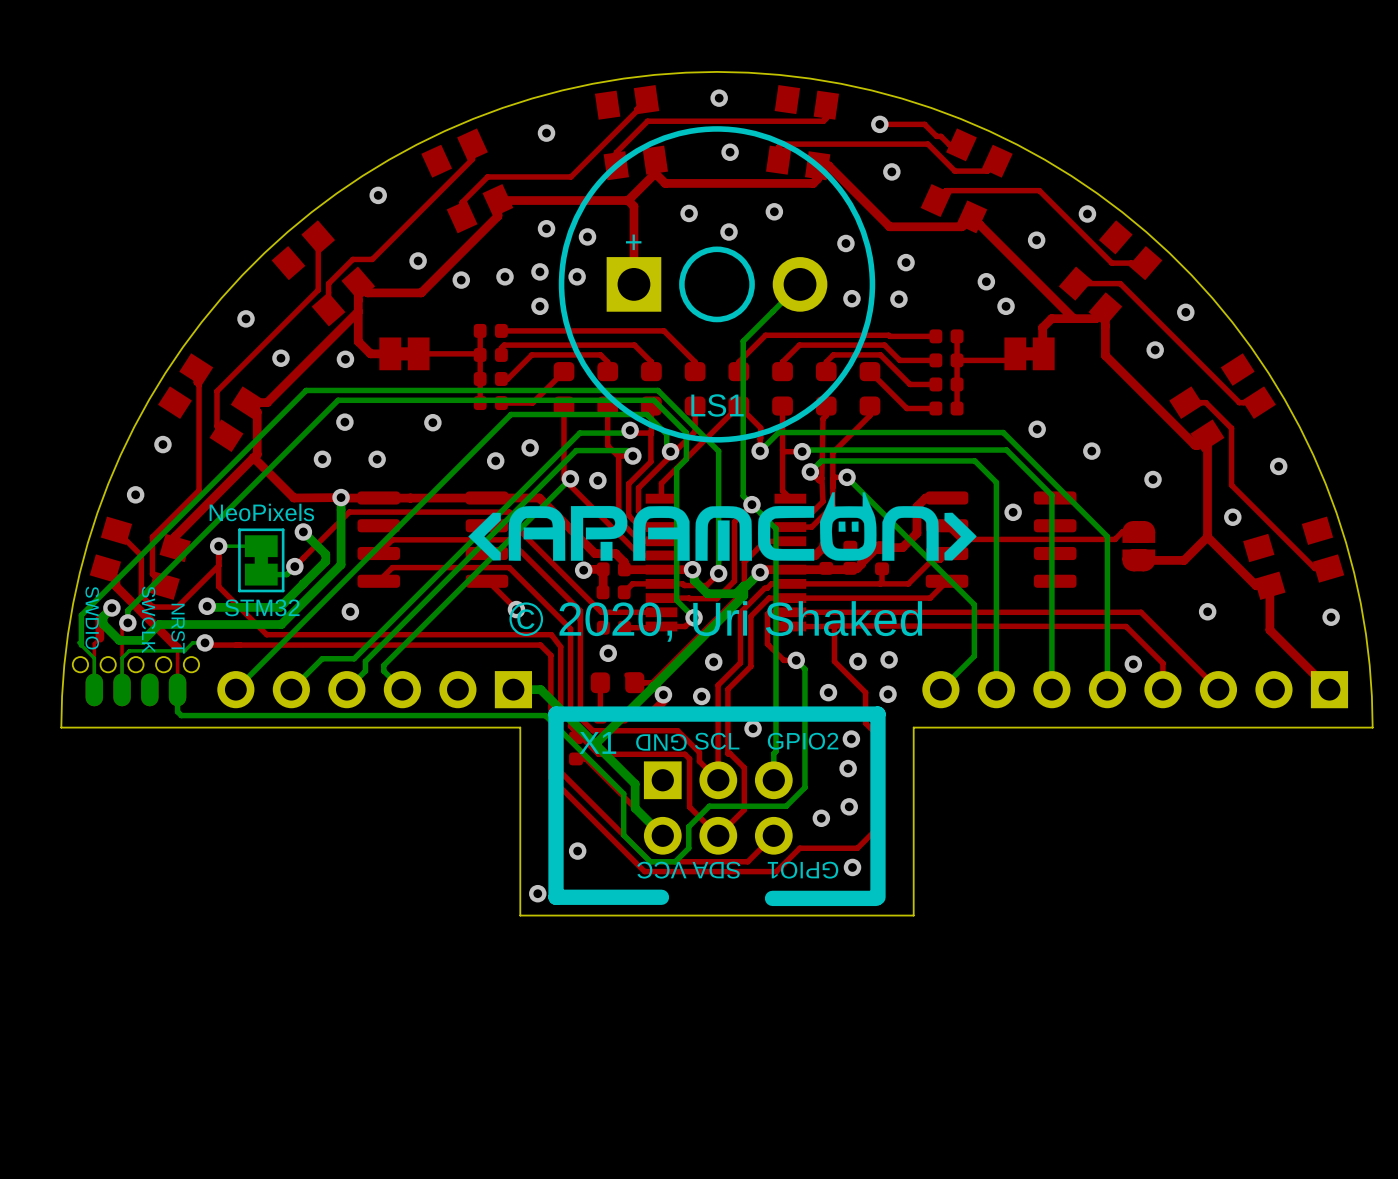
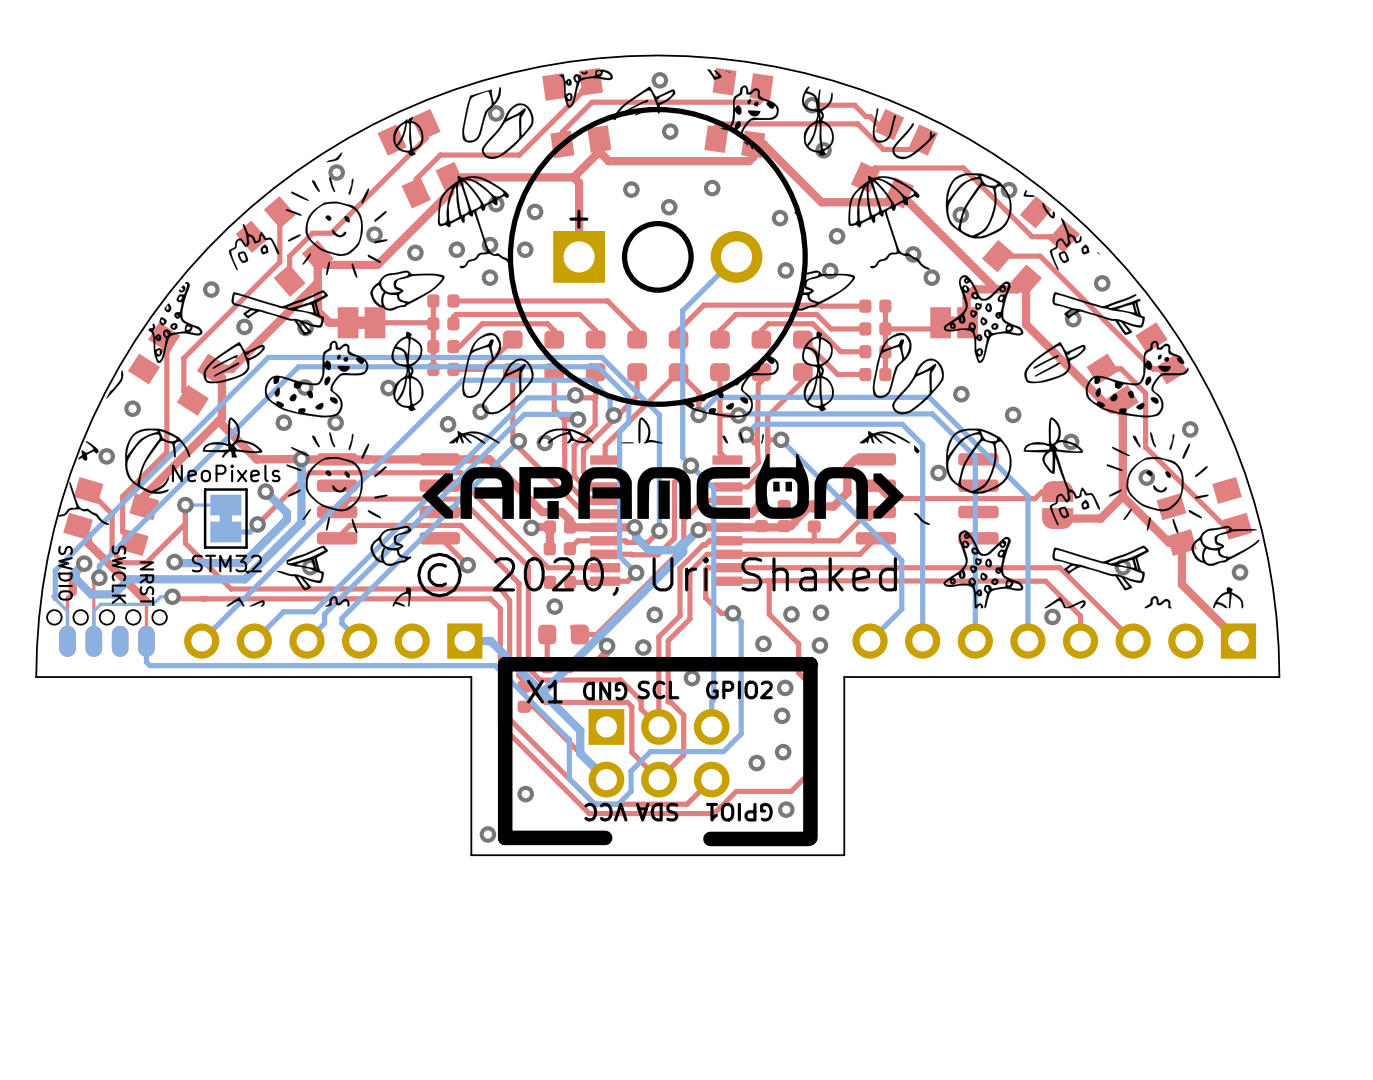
drawing: none -> [58, 69, 1260, 609]
LS1 name: LS1 (717, 405) -> none

